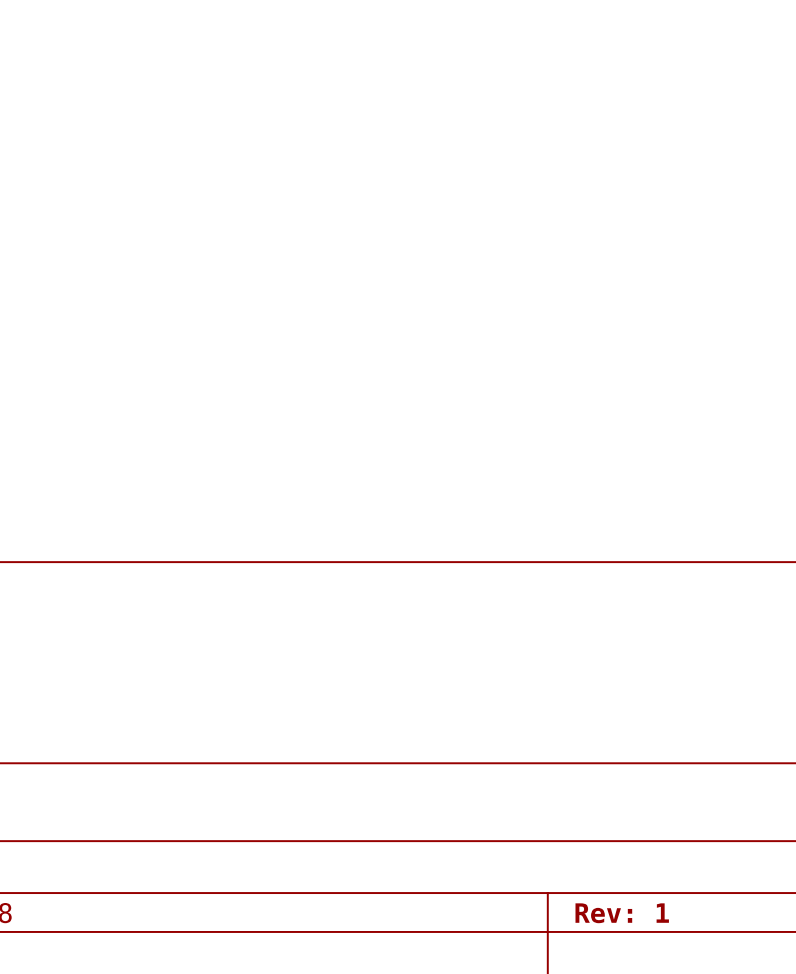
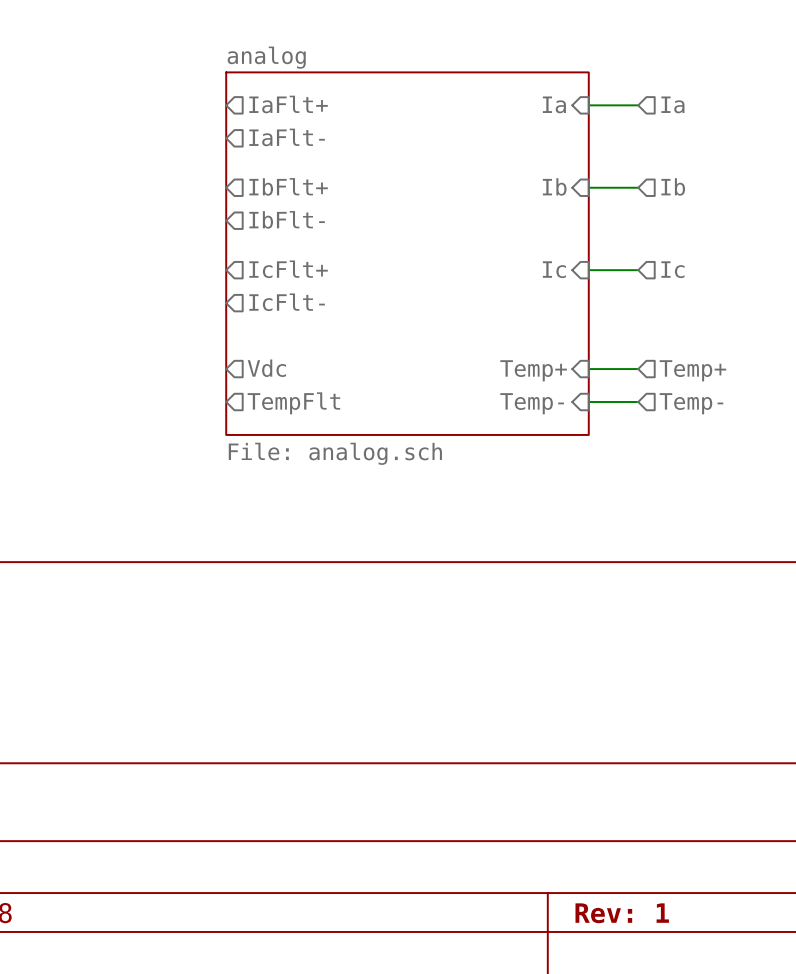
sheet pin: none -> IaFlt+ (288, 104)
sheet pin: none -> Ia (554, 104)
hierarchical label: none -> Ia (672, 104)
wire: none -> (588, 105) (638, 105)
sheet pin: none -> IaFlt- (287, 137)
sheet pin: none -> IbFlt+ (288, 186)
sheet pin: none -> Ib (554, 186)
hierarchical label: none -> Ib (673, 186)
wire: none -> (588, 187) (638, 187)
sheet pin: none -> IbFlt- (287, 219)
sheet analog: none -> File: analog.sch (407, 253)
sheet pin: none -> IcFlt+ (288, 269)
sheet pin: none -> Ic (554, 269)
hierarchical label: none -> Ic (672, 269)
wire: none -> (588, 270) (638, 270)
sheet pin: none -> IcFlt- (287, 302)
sheet pin: none -> Vdc (266, 368)
wire: none -> (588, 369) (638, 369)
sheet pin: none -> Temp+ (533, 370)
hierarchical label: none -> Temp+ (692, 370)
wire: none -> (588, 402) (638, 402)
sheet pin: none -> TempFlt (293, 403)
sheet pin: none -> Temp- (532, 403)
hierarchical label: none -> Temp- (691, 403)

